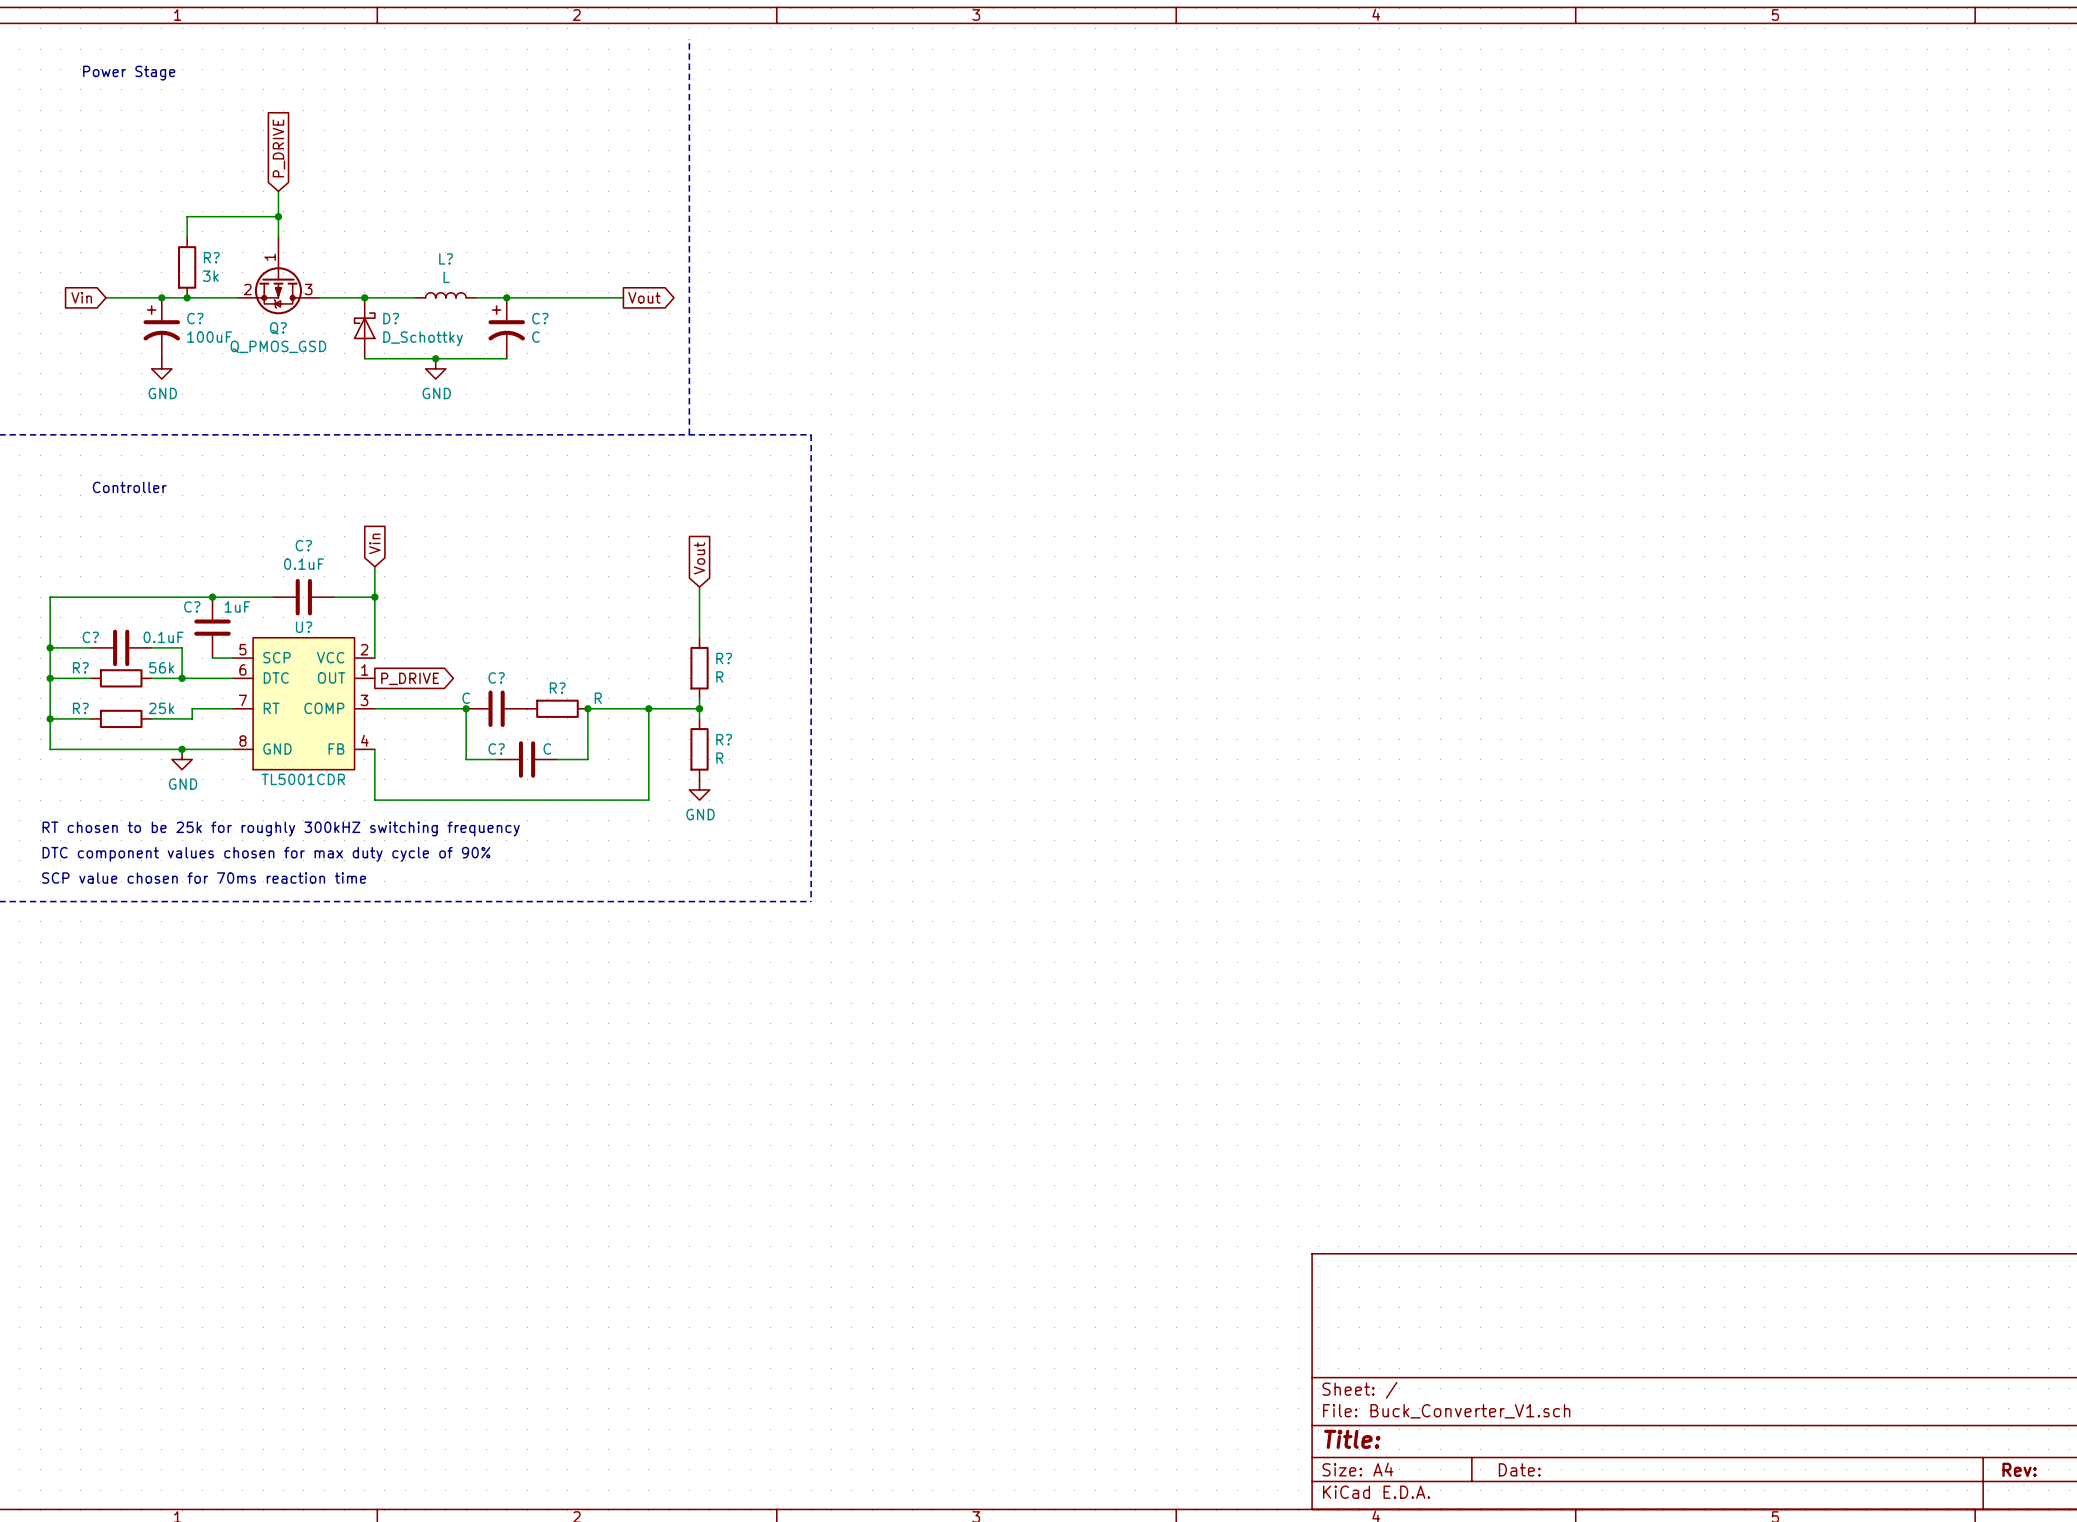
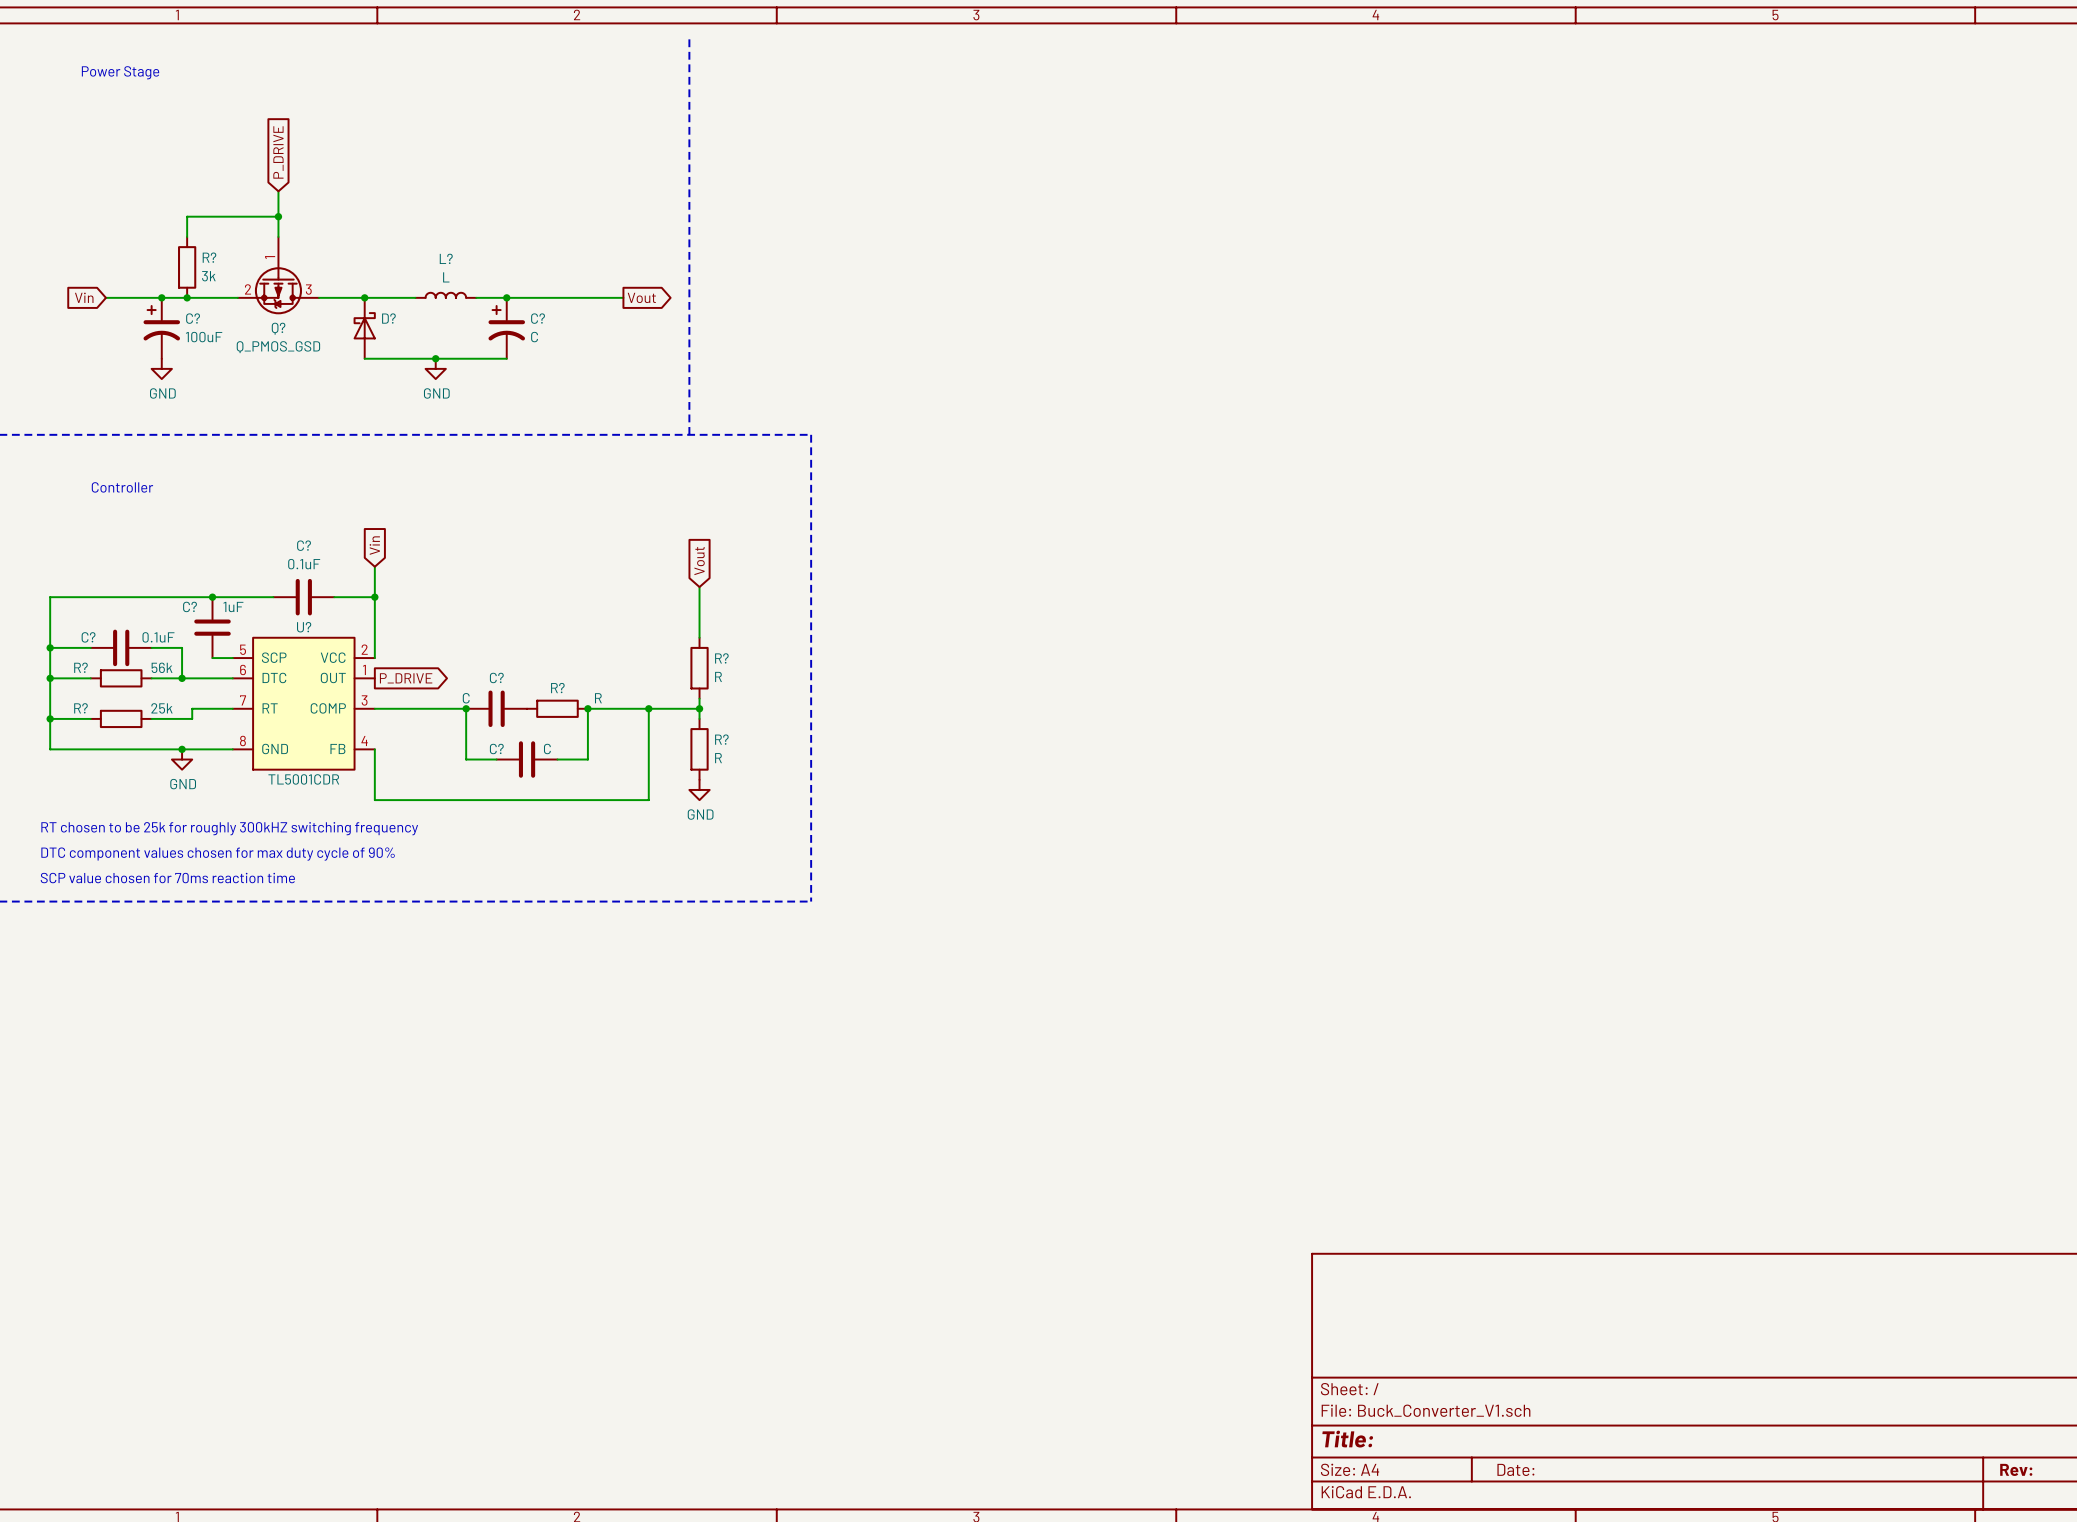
D? value: D_Schottky (423, 338) -> none

